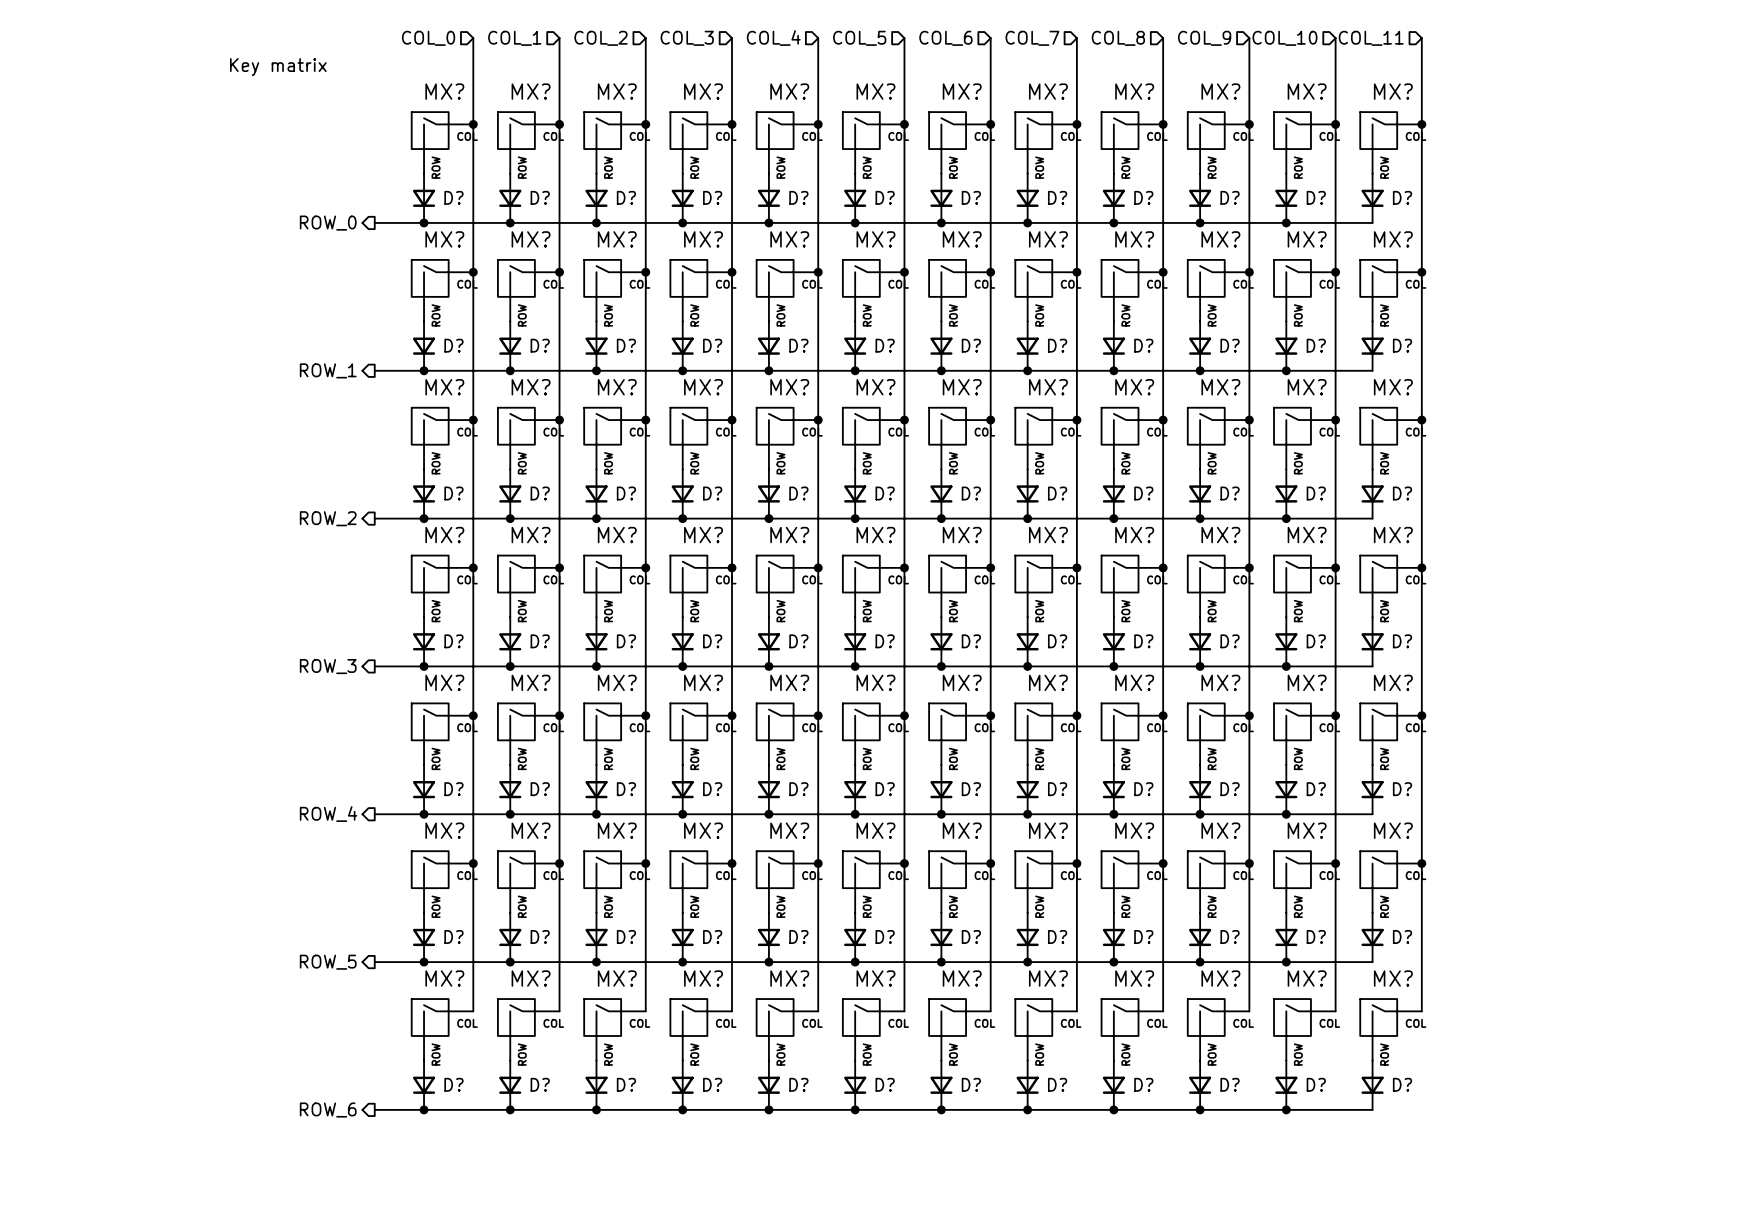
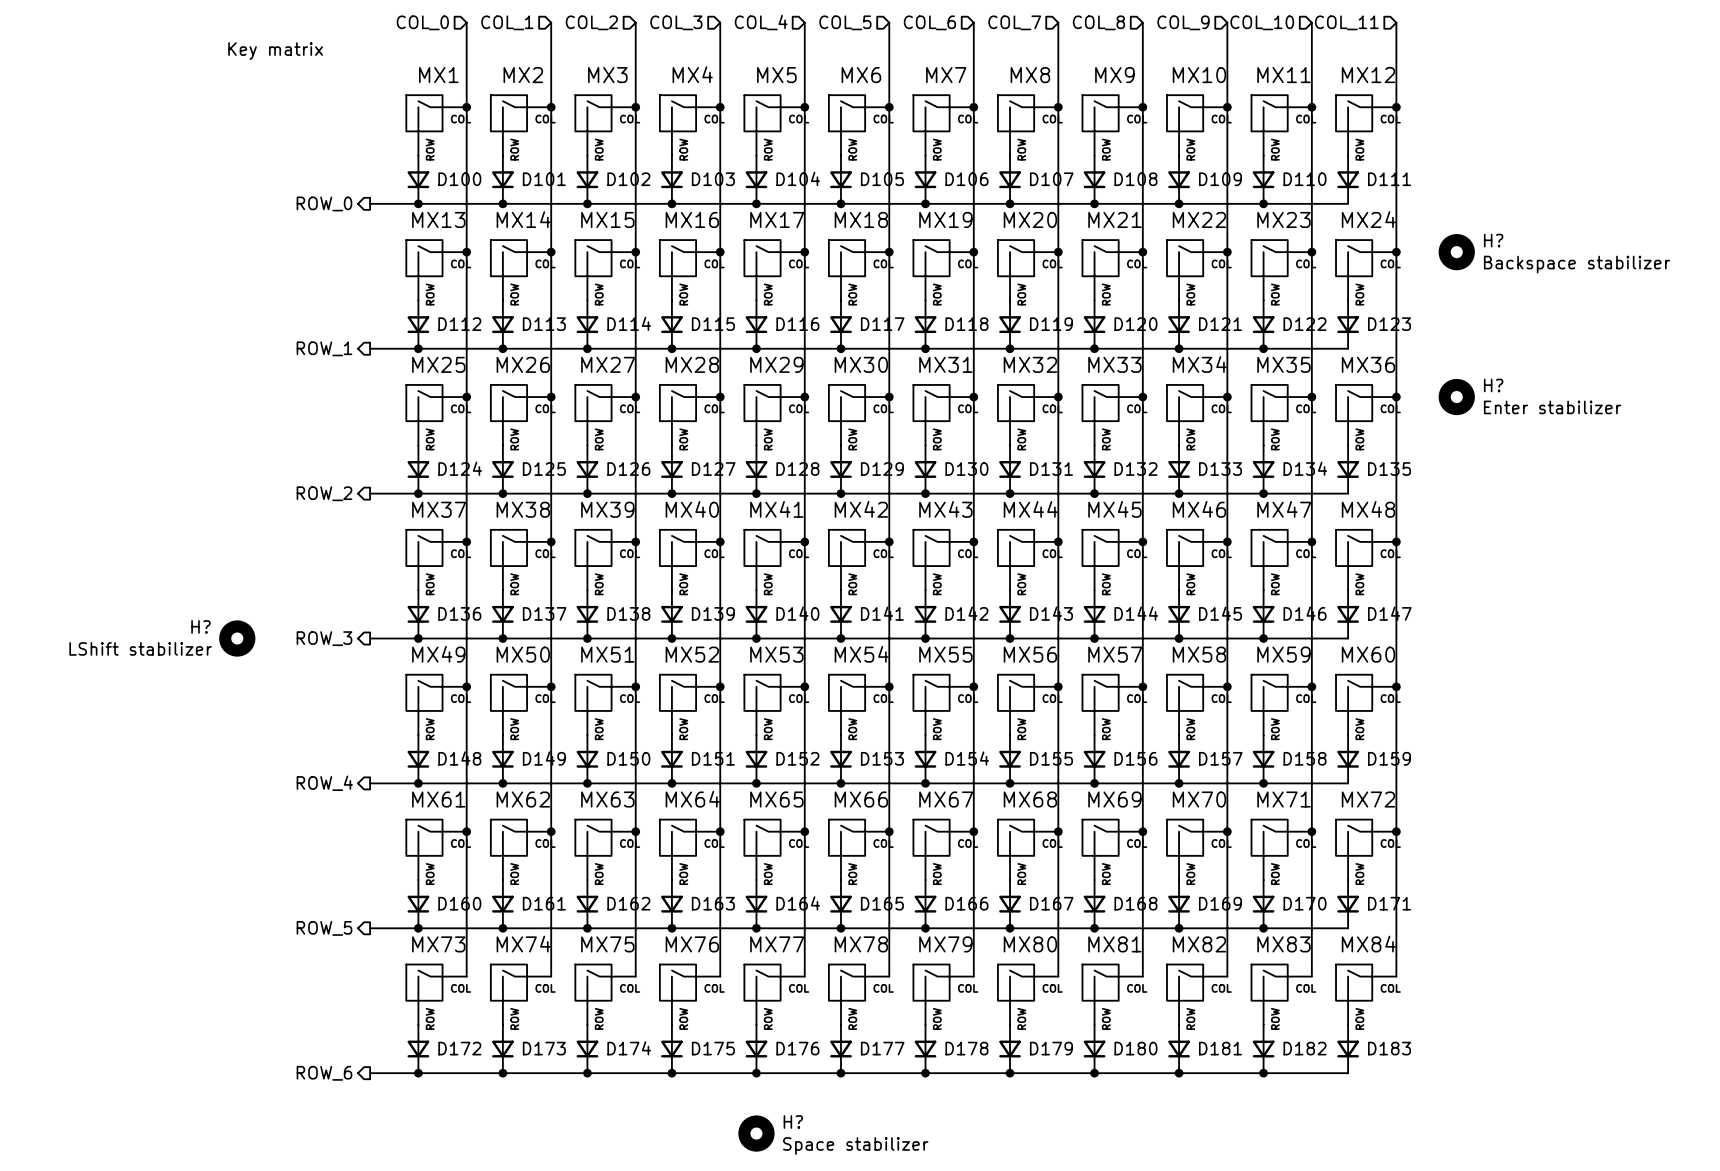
MX? name: MX? (444, 91) -> MX1 (438, 75)
MX? name: MX? (531, 91) -> MX2 (523, 75)
MX? name: MX? (617, 91) -> MX3 (607, 75)
MX? name: MX? (703, 91) -> MX4 (692, 74)
MX? name: MX? (789, 91) -> MX5 (776, 75)
MX? name: MX? (875, 91) -> MX6 (861, 75)
MX? name: MX? (962, 91) -> MX7 (946, 75)
MX? name: MX? (1048, 91) -> MX8 (1030, 75)
MX? name: MX? (1134, 91) -> MX9 (1114, 75)
MX? name: MX? (1220, 91) -> MX10 (1199, 75)
MX? name: MX? (1307, 91) -> MX11 (1283, 75)
MX? name: MX? (1393, 91) -> MX12 (1368, 75)
D? name: D? (453, 197) -> D100 (459, 179)
D? name: D? (540, 197) -> D101 (544, 179)
D? name: D? (626, 197) -> D102 (628, 179)
D? name: D? (712, 197) -> D103 (713, 179)
D? name: D? (798, 197) -> D104 (798, 178)
D? name: D? (885, 197) -> D105 (882, 179)
D? name: D? (971, 197) -> D106 (966, 179)
D? name: D? (1057, 197) -> D107 (1051, 179)
D? name: D? (1143, 197) -> D108 (1135, 179)
D? name: D? (1230, 197) -> D109 (1220, 179)
D? name: D? (1316, 197) -> D110 (1305, 179)
D? name: D? (1402, 197) -> D111 (1389, 179)
MX? name: MX? (444, 239) -> MX13 (438, 219)
MX? name: MX? (531, 239) -> MX14 (523, 219)
MX? name: MX? (617, 239) -> MX15 (607, 219)
MX? name: MX? (703, 239) -> MX16 (692, 219)
MX? name: MX? (789, 239) -> MX17 (777, 219)
MX? name: MX? (875, 239) -> MX18 (861, 219)
MX? name: MX? (962, 239) -> MX19 (945, 219)
MX? name: MX? (1048, 239) -> MX20 (1030, 219)
MX? name: MX? (1134, 239) -> MX21 (1114, 219)
MX? name: MX? (1220, 239) -> MX22 (1199, 219)
MX? name: MX? (1307, 239) -> MX23 (1283, 219)
MX? name: MX? (1393, 239) -> MX24 (1368, 219)
H?: none -> Backspace stabilizer (1456, 252)
D? name: D? (453, 345) -> D112 (459, 324)
D? name: D? (540, 345) -> D113 (544, 324)
D? name: D? (626, 345) -> D114 (629, 323)
D? name: D? (712, 345) -> D115 (713, 324)
D? name: D? (798, 345) -> D116 (797, 324)
D? name: D? (885, 345) -> D117 (882, 324)
D? name: D? (971, 345) -> D118 (966, 324)
D? name: D? (1057, 345) -> D119 (1051, 324)
D? name: D? (1143, 345) -> D120 (1135, 324)
D? name: D? (1230, 345) -> D121 (1220, 324)
D? name: D? (1316, 345) -> D122 (1305, 324)
D? name: D? (1402, 345) -> D123 (1389, 324)
MX? name: MX? (444, 387) -> MX25 (438, 364)
MX? name: MX? (531, 387) -> MX26 (523, 364)
MX? name: MX? (617, 387) -> MX27 (608, 364)
MX? name: MX? (703, 387) -> MX28 (692, 364)
MX? name: MX? (789, 387) -> MX29 (776, 364)
MX? name: MX? (875, 387) -> MX30 (861, 364)
MX? name: MX? (962, 387) -> MX31 (945, 364)
MX? name: MX? (1048, 387) -> MX32 (1030, 364)
MX? name: MX? (1134, 387) -> MX33 (1114, 364)
MX? name: MX? (1220, 387) -> MX34 (1199, 364)
MX? name: MX? (1307, 387) -> MX35 (1283, 364)
MX? name: MX? (1393, 387) -> MX36 (1368, 364)
H?: none -> Enter stabilizer (1456, 397)
D? name: D? (453, 493) -> D124 (460, 468)
D? name: D? (540, 493) -> D125 (544, 469)
D? name: D? (626, 493) -> D126 (628, 469)
D? name: D? (712, 493) -> D127 (713, 469)
D? name: D? (798, 493) -> D128 (797, 469)
D? name: D? (885, 493) -> D129 (882, 469)
D? name: D? (971, 493) -> D130 (966, 469)
D? name: D? (1057, 493) -> D131 (1051, 469)
D? name: D? (1143, 493) -> D132 (1135, 469)
D? name: D? (1230, 493) -> D133 (1220, 469)
D? name: D? (1316, 493) -> D134 (1305, 468)
D? name: D? (1402, 493) -> D135 (1389, 469)
MX? name: MX? (444, 535) -> MX37 (439, 509)
MX? name: MX? (531, 535) -> MX38 (523, 509)
MX? name: MX? (617, 535) -> MX39 (607, 509)
MX? name: MX? (703, 535) -> MX40 (692, 509)
MX? name: MX? (789, 535) -> MX41 (776, 509)
MX? name: MX? (875, 535) -> MX42 (861, 509)
MX? name: MX? (962, 535) -> MX43 (945, 509)
MX? name: MX? (1048, 535) -> MX44 (1030, 509)
MX? name: MX? (1134, 535) -> MX45 (1114, 509)
MX? name: MX? (1220, 535) -> MX46 (1199, 509)
MX? name: MX? (1307, 535) -> MX47 (1284, 509)
MX? name: MX? (1393, 535) -> MX48 (1368, 509)
D? name: D? (453, 641) -> D136 (459, 613)
D? name: D? (540, 641) -> D137 (544, 613)
D? name: D? (626, 641) -> D138 (628, 613)
D? name: D? (712, 641) -> D139 (713, 613)
D? name: D? (798, 641) -> D140 (797, 613)
D? name: D? (885, 641) -> D141 (882, 613)
D? name: D? (971, 641) -> D142 (966, 613)
D? name: D? (1057, 641) -> D143 (1051, 613)
D? name: D? (1143, 641) -> D144 (1136, 613)
D? name: D? (1230, 641) -> D145 (1220, 613)
D? name: D? (1316, 641) -> D146 (1305, 613)
D? name: D? (1402, 641) -> D147 (1389, 613)
H?: none -> LShift stabilizer (237, 638)
MX? name: MX? (444, 682) -> MX49 (438, 654)
MX? name: MX? (531, 682) -> MX50 (523, 654)
MX? name: MX? (617, 682) -> MX51 (607, 654)
MX? name: MX? (703, 682) -> MX52 (692, 654)
MX? name: MX? (789, 682) -> MX53 (776, 654)
MX? name: MX? (875, 682) -> MX54 (861, 654)
MX? name: MX? (962, 682) -> MX55 (945, 654)
MX? name: MX? (1048, 682) -> MX56 (1030, 654)
MX? name: MX? (1134, 682) -> MX57 (1115, 654)
MX? name: MX? (1220, 682) -> MX58 (1199, 654)
MX? name: MX? (1307, 682) -> MX59 (1283, 654)
MX? name: MX? (1393, 682) -> MX60 (1368, 654)
D? name: D? (453, 789) -> D148 (459, 758)
D? name: D? (540, 789) -> D149 (544, 758)
D? name: D? (626, 789) -> D150 (628, 758)
D? name: D? (712, 789) -> D151 (713, 758)
D? name: D? (798, 789) -> D152 (797, 758)
D? name: D? (885, 789) -> D153 (882, 758)
D? name: D? (971, 789) -> D154 (967, 758)
D? name: D? (1057, 789) -> D155 (1051, 758)
D? name: D? (1143, 789) -> D156 (1135, 758)
D? name: D? (1230, 789) -> D157 (1220, 758)
D? name: D? (1316, 789) -> D158 (1305, 758)
D? name: D? (1402, 789) -> D159 (1389, 758)
MX? name: MX? (444, 830) -> MX61 (438, 799)
MX? name: MX? (531, 830) -> MX62 (523, 799)
MX? name: MX? (617, 830) -> MX63 (607, 799)
MX? name: MX? (703, 830) -> MX64 (692, 799)
MX? name: MX? (789, 830) -> MX65 (776, 799)
MX? name: MX? (875, 830) -> MX66 (861, 799)
MX? name: MX? (962, 830) -> MX67 (946, 799)
MX? name: MX? (1048, 830) -> MX68 (1030, 799)
MX? name: MX? (1134, 830) -> MX69 (1114, 799)
MX? name: MX? (1220, 830) -> MX70 (1199, 799)
MX? name: MX? (1307, 830) -> MX71 (1283, 799)
MX? name: MX? (1393, 830) -> MX72 (1368, 799)
D? name: D? (453, 936) -> D160 (459, 903)
D? name: D? (540, 936) -> D161 (544, 903)
D? name: D? (626, 936) -> D162 (628, 903)
D? name: D? (712, 936) -> D163 (713, 903)
D? name: D? (798, 936) -> D164 (798, 903)
D? name: D? (885, 936) -> D165 (882, 903)
D? name: D? (971, 936) -> D166 (966, 903)
D? name: D? (1057, 936) -> D167 (1051, 903)
D? name: D? (1143, 936) -> D168 (1135, 903)
D? name: D? (1230, 936) -> D169 (1220, 903)
D? name: D? (1316, 936) -> D170 (1305, 903)
D? name: D? (1402, 936) -> D171 (1389, 903)
MX? name: MX? (444, 978) -> MX73 (438, 944)
MX? name: MX? (531, 978) -> MX74 (523, 944)
MX? name: MX? (617, 978) -> MX75 (607, 944)
MX? name: MX? (703, 978) -> MX76 (692, 944)
MX? name: MX? (789, 978) -> MX77 (777, 944)
MX? name: MX? (875, 978) -> MX78 (861, 944)
MX? name: MX? (962, 978) -> MX79 (945, 944)
MX? name: MX? (1048, 978) -> MX80 (1030, 944)
MX? name: MX? (1134, 978) -> MX81 (1114, 944)
MX? name: MX? (1220, 978) -> MX82 (1199, 944)
MX? name: MX? (1307, 978) -> MX83 (1283, 944)
MX? name: MX? (1393, 978) -> MX84 (1368, 944)
D? name: D? (453, 1084) -> D172 (459, 1048)
D? name: D? (540, 1084) -> D173 (544, 1048)
D? name: D? (626, 1084) -> D174 (629, 1048)
D? name: D? (712, 1084) -> D175 (713, 1048)
D? name: D? (798, 1084) -> D176 (797, 1048)
D? name: D? (885, 1084) -> D177 (882, 1048)
D? name: D? (971, 1084) -> D178 (966, 1048)
D? name: D? (1057, 1084) -> D179 (1051, 1048)
D? name: D? (1143, 1084) -> D180 (1135, 1048)
D? name: D? (1230, 1084) -> D181 (1220, 1048)
D? name: D? (1316, 1084) -> D182 (1305, 1048)
D? name: D? (1402, 1084) -> D183 (1389, 1048)
H?: none -> Space stabilizer (756, 1133)

